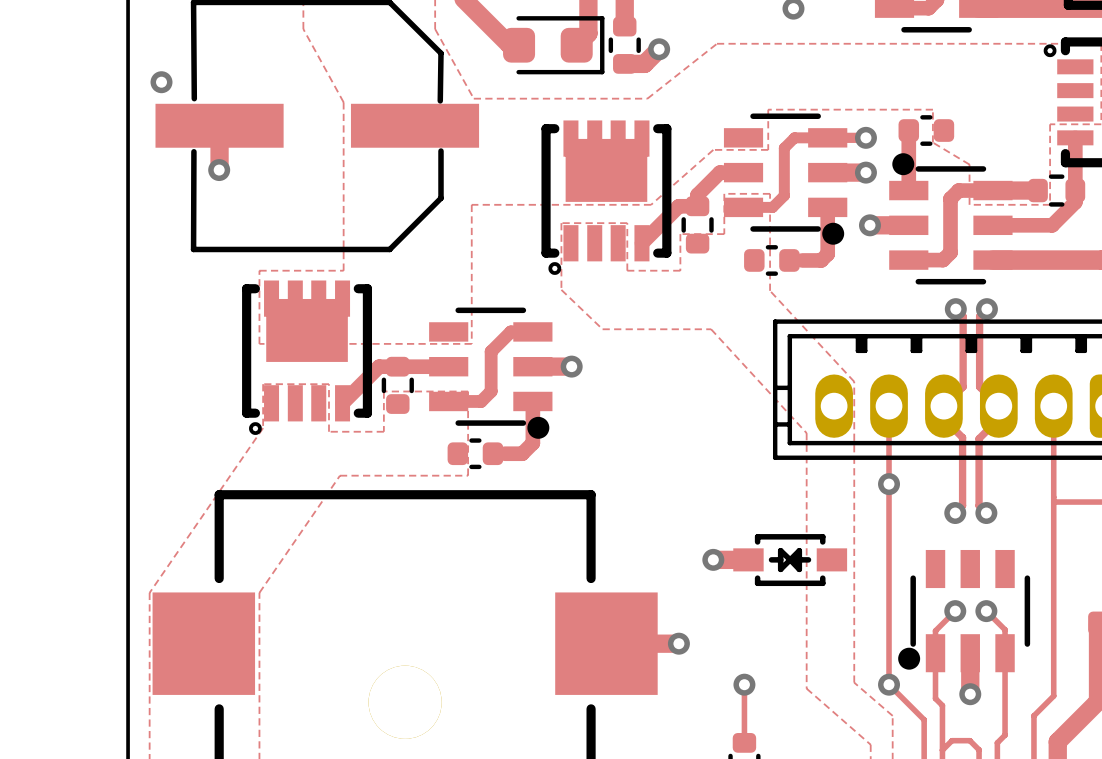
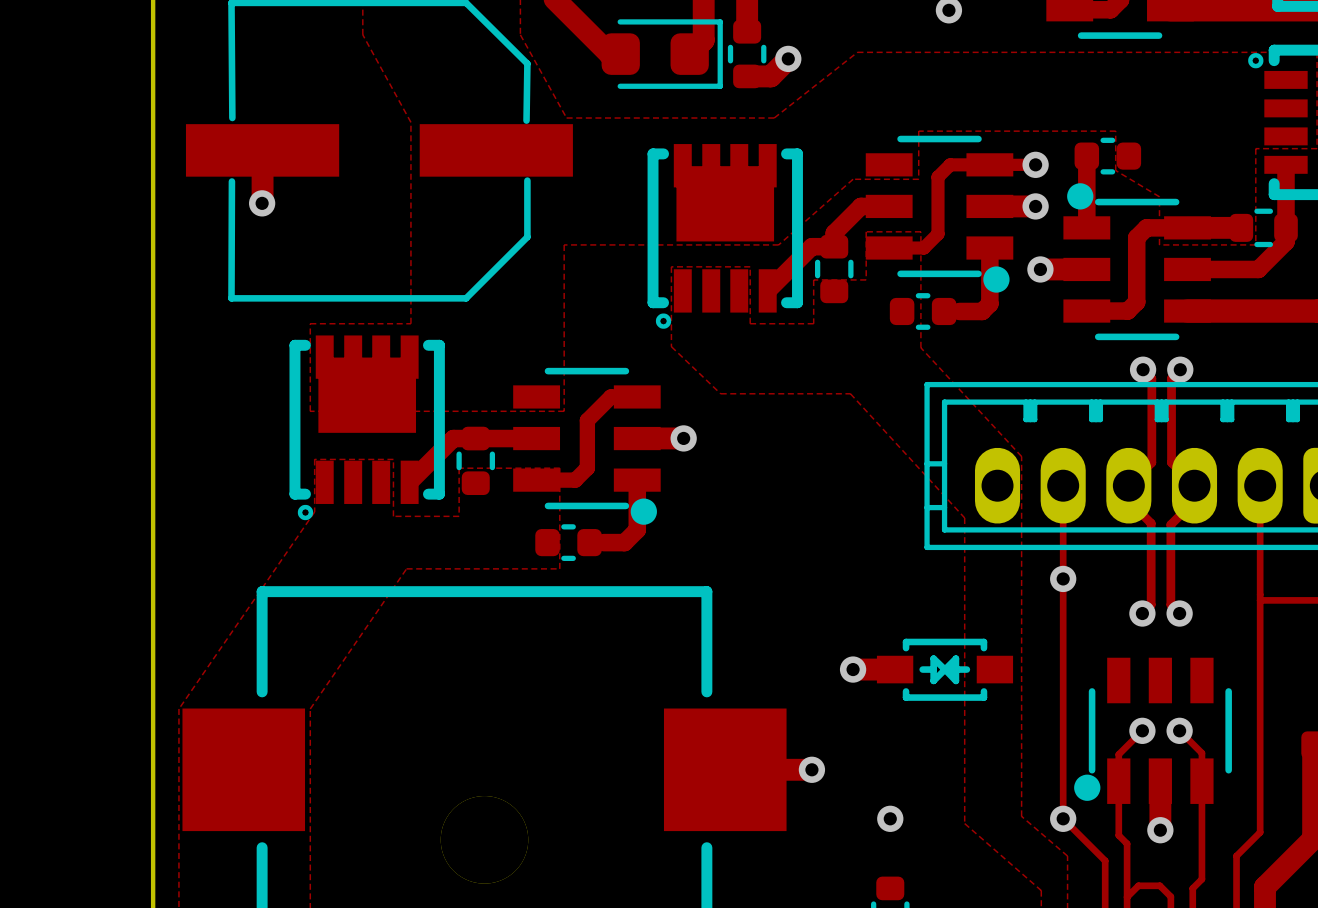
via: (161, 82) -> none
track: (744, 684) (744, 742) -> none

